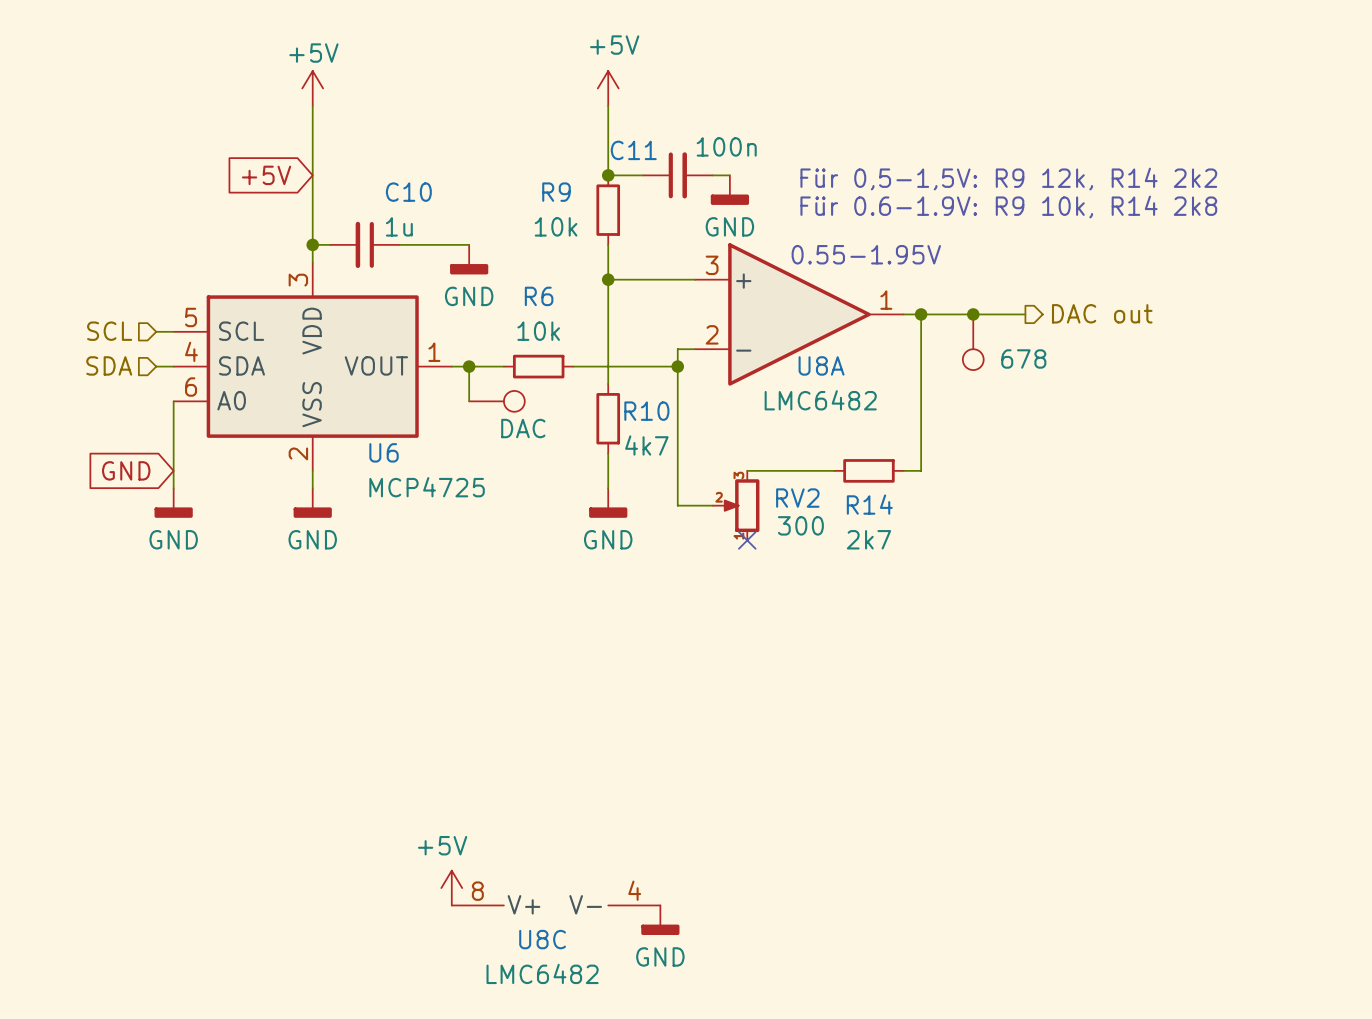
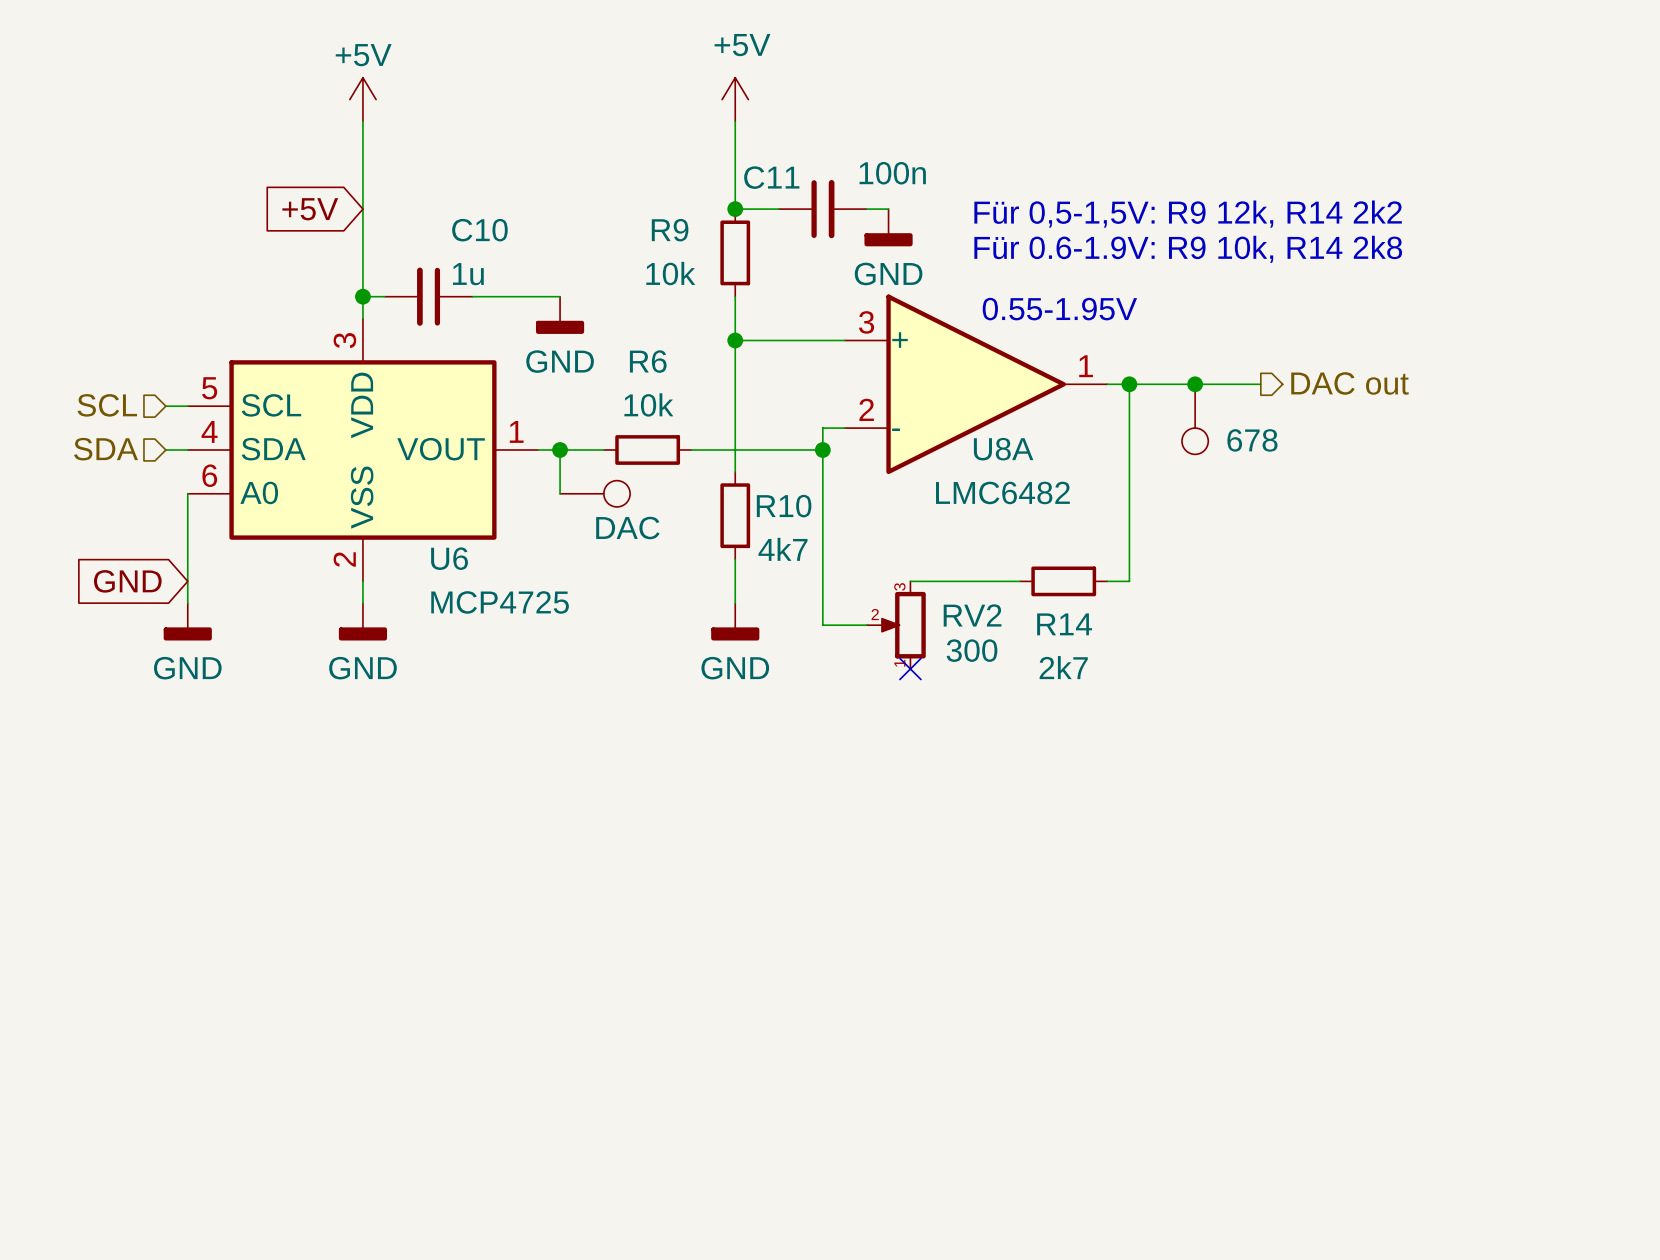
power symbol: +5V (451, 888) -> none
U8C: LMC6482 (556, 905) -> none
power symbol: GND (660, 920) -> none

